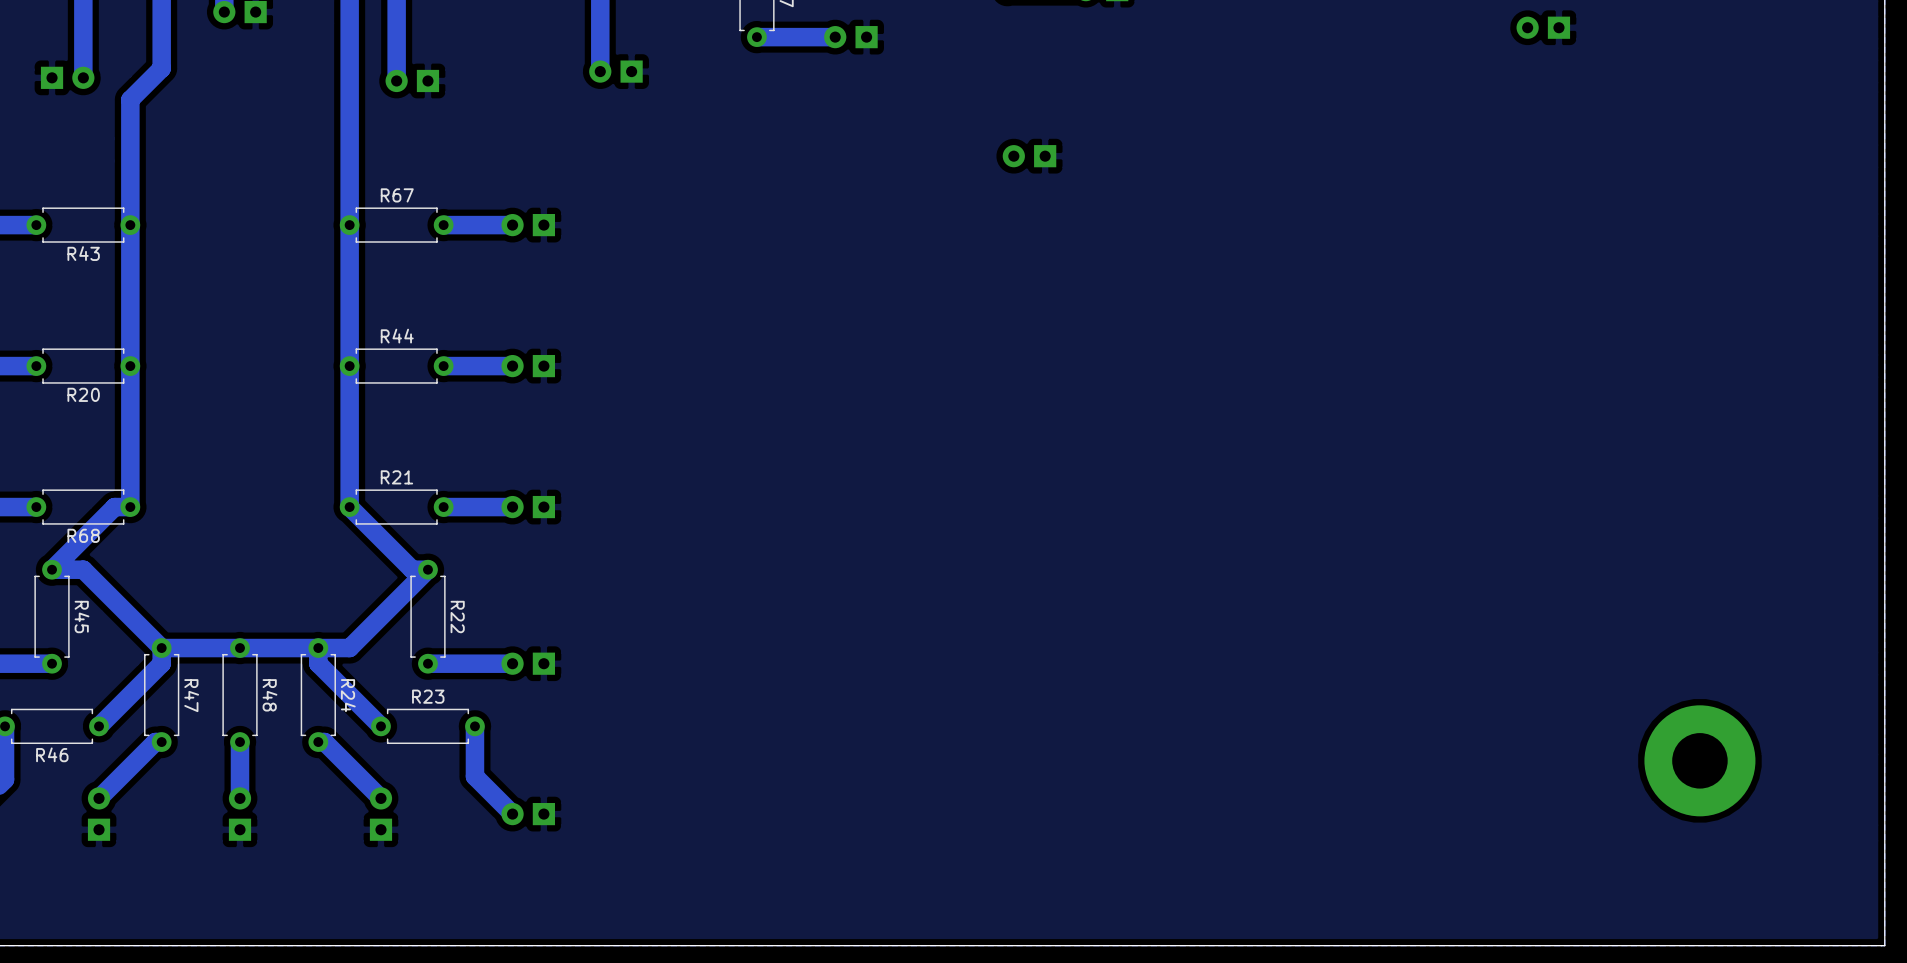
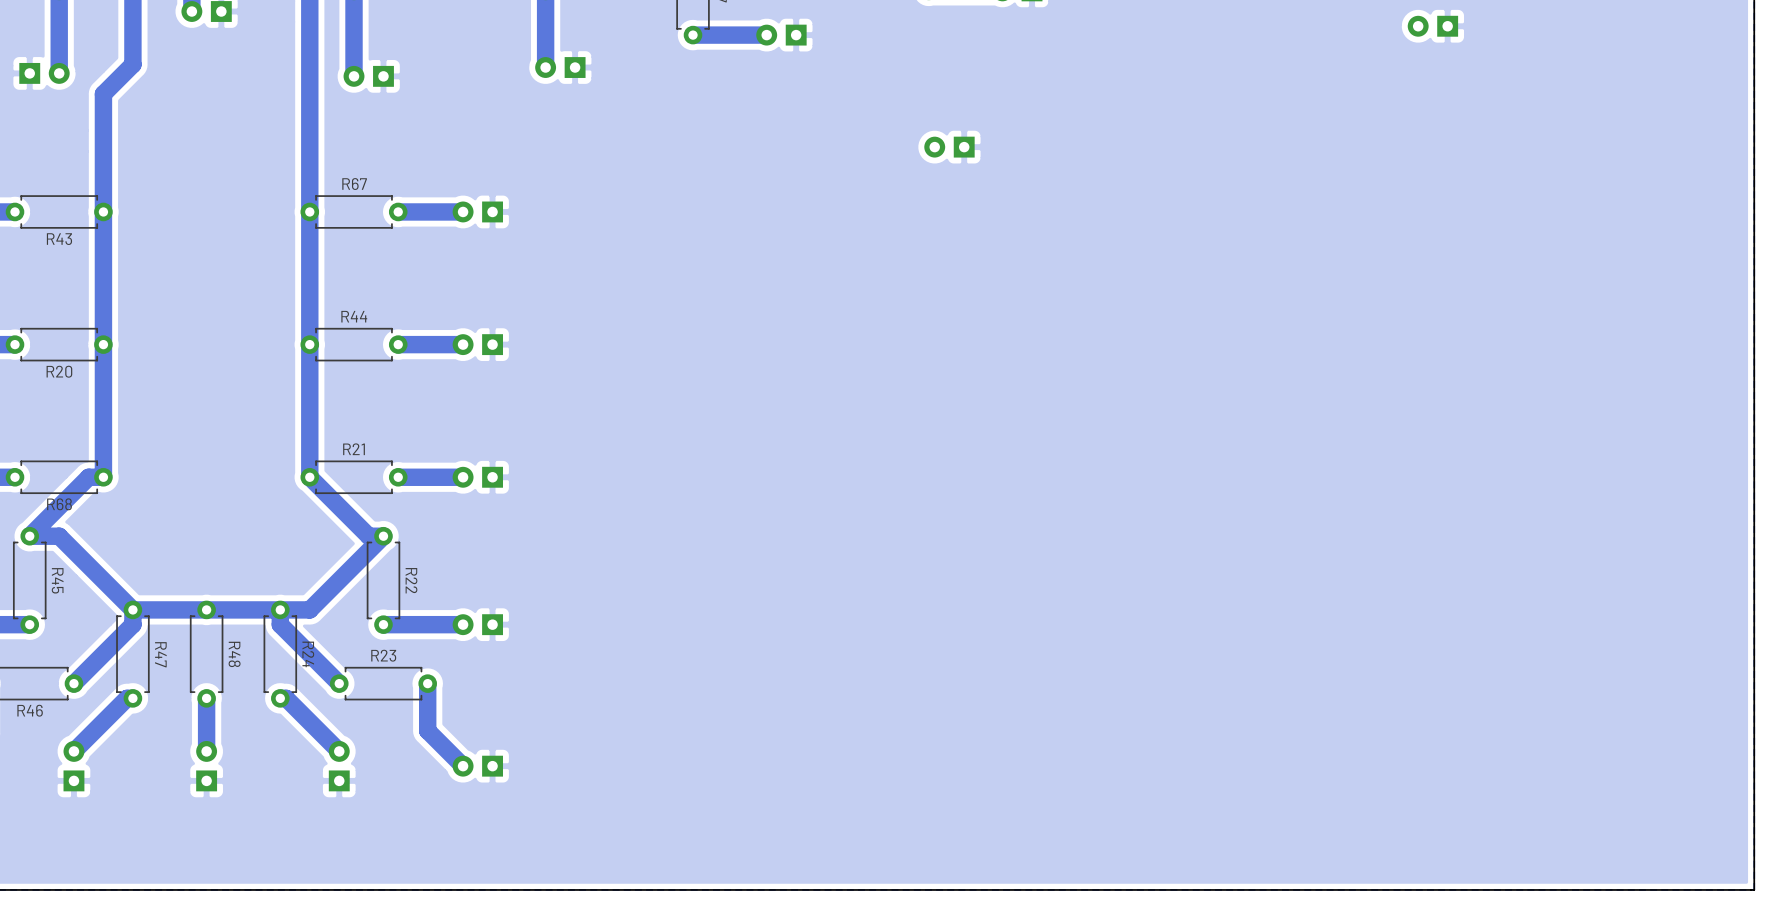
part: (1699, 760) -> none

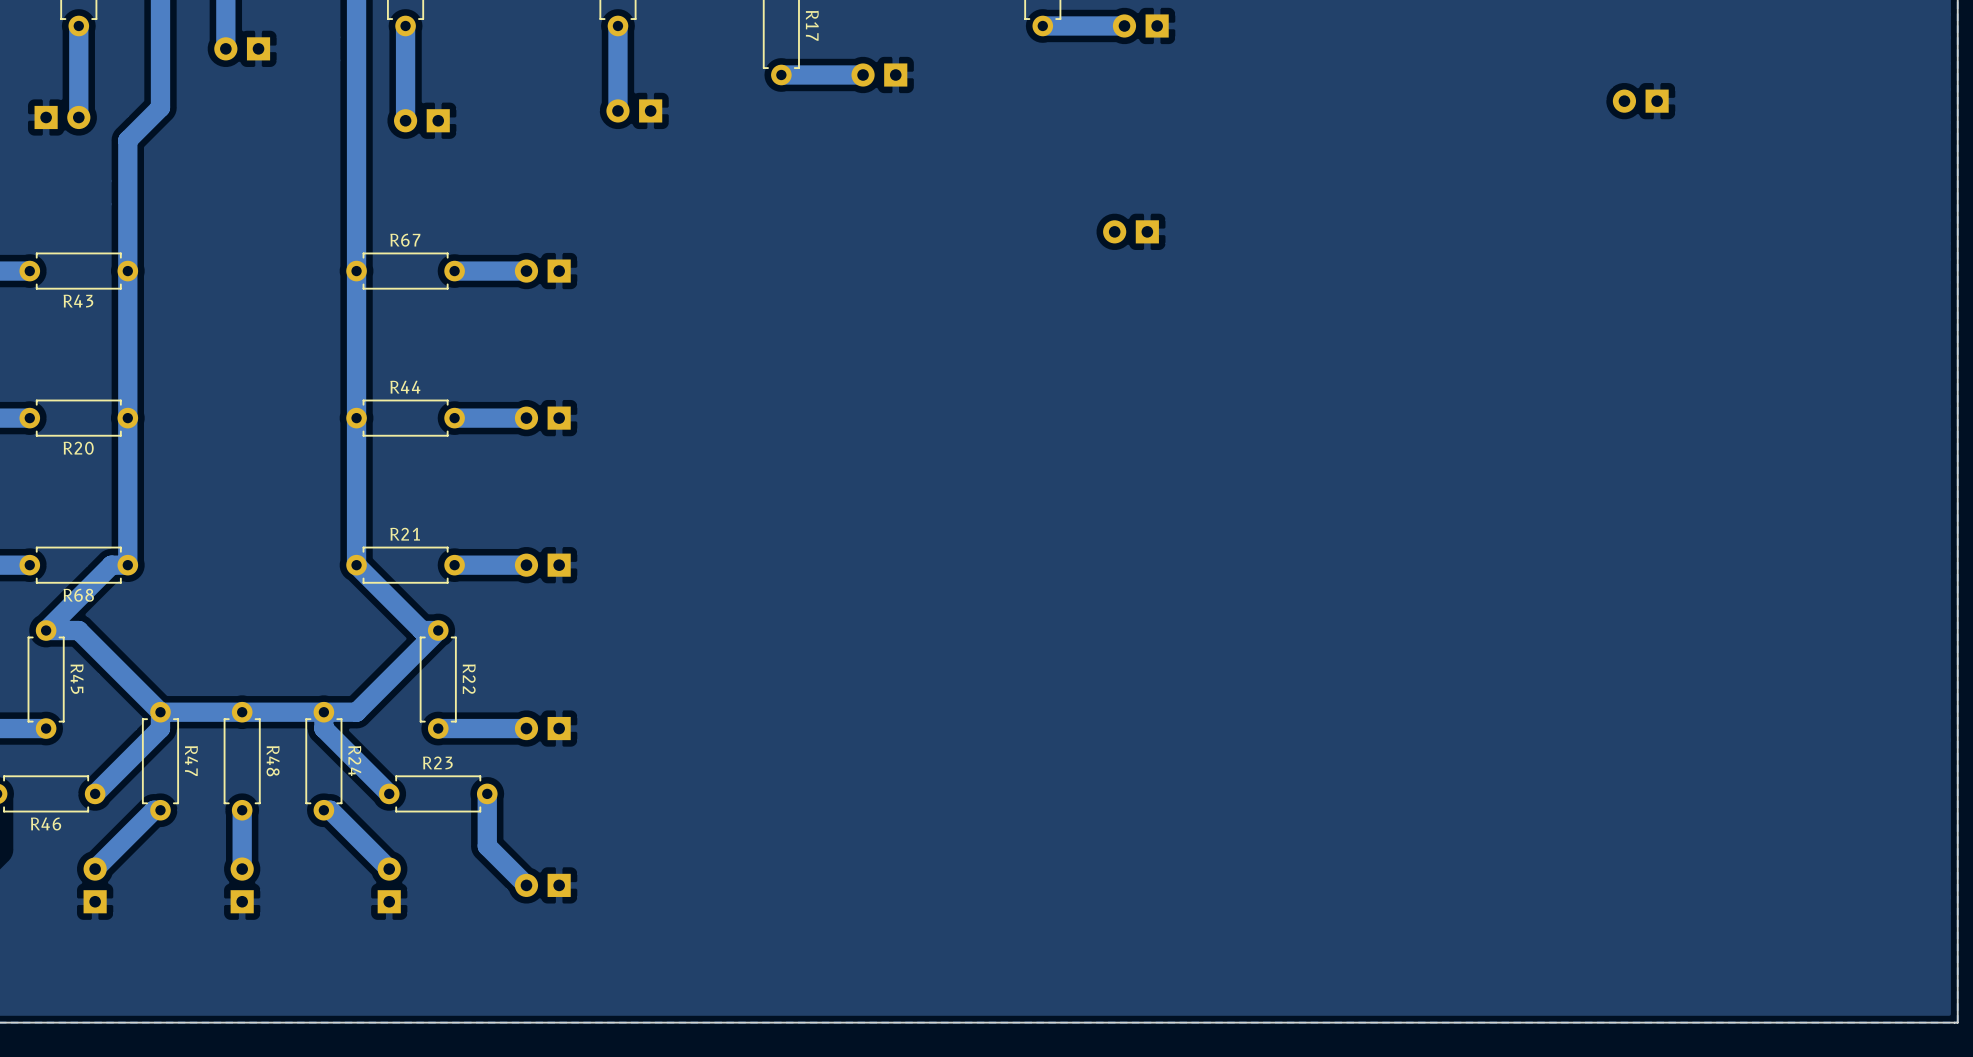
part position: (1432, 26) -> (1640, 101)
part position: (949, 147) -> (1131, 231)

